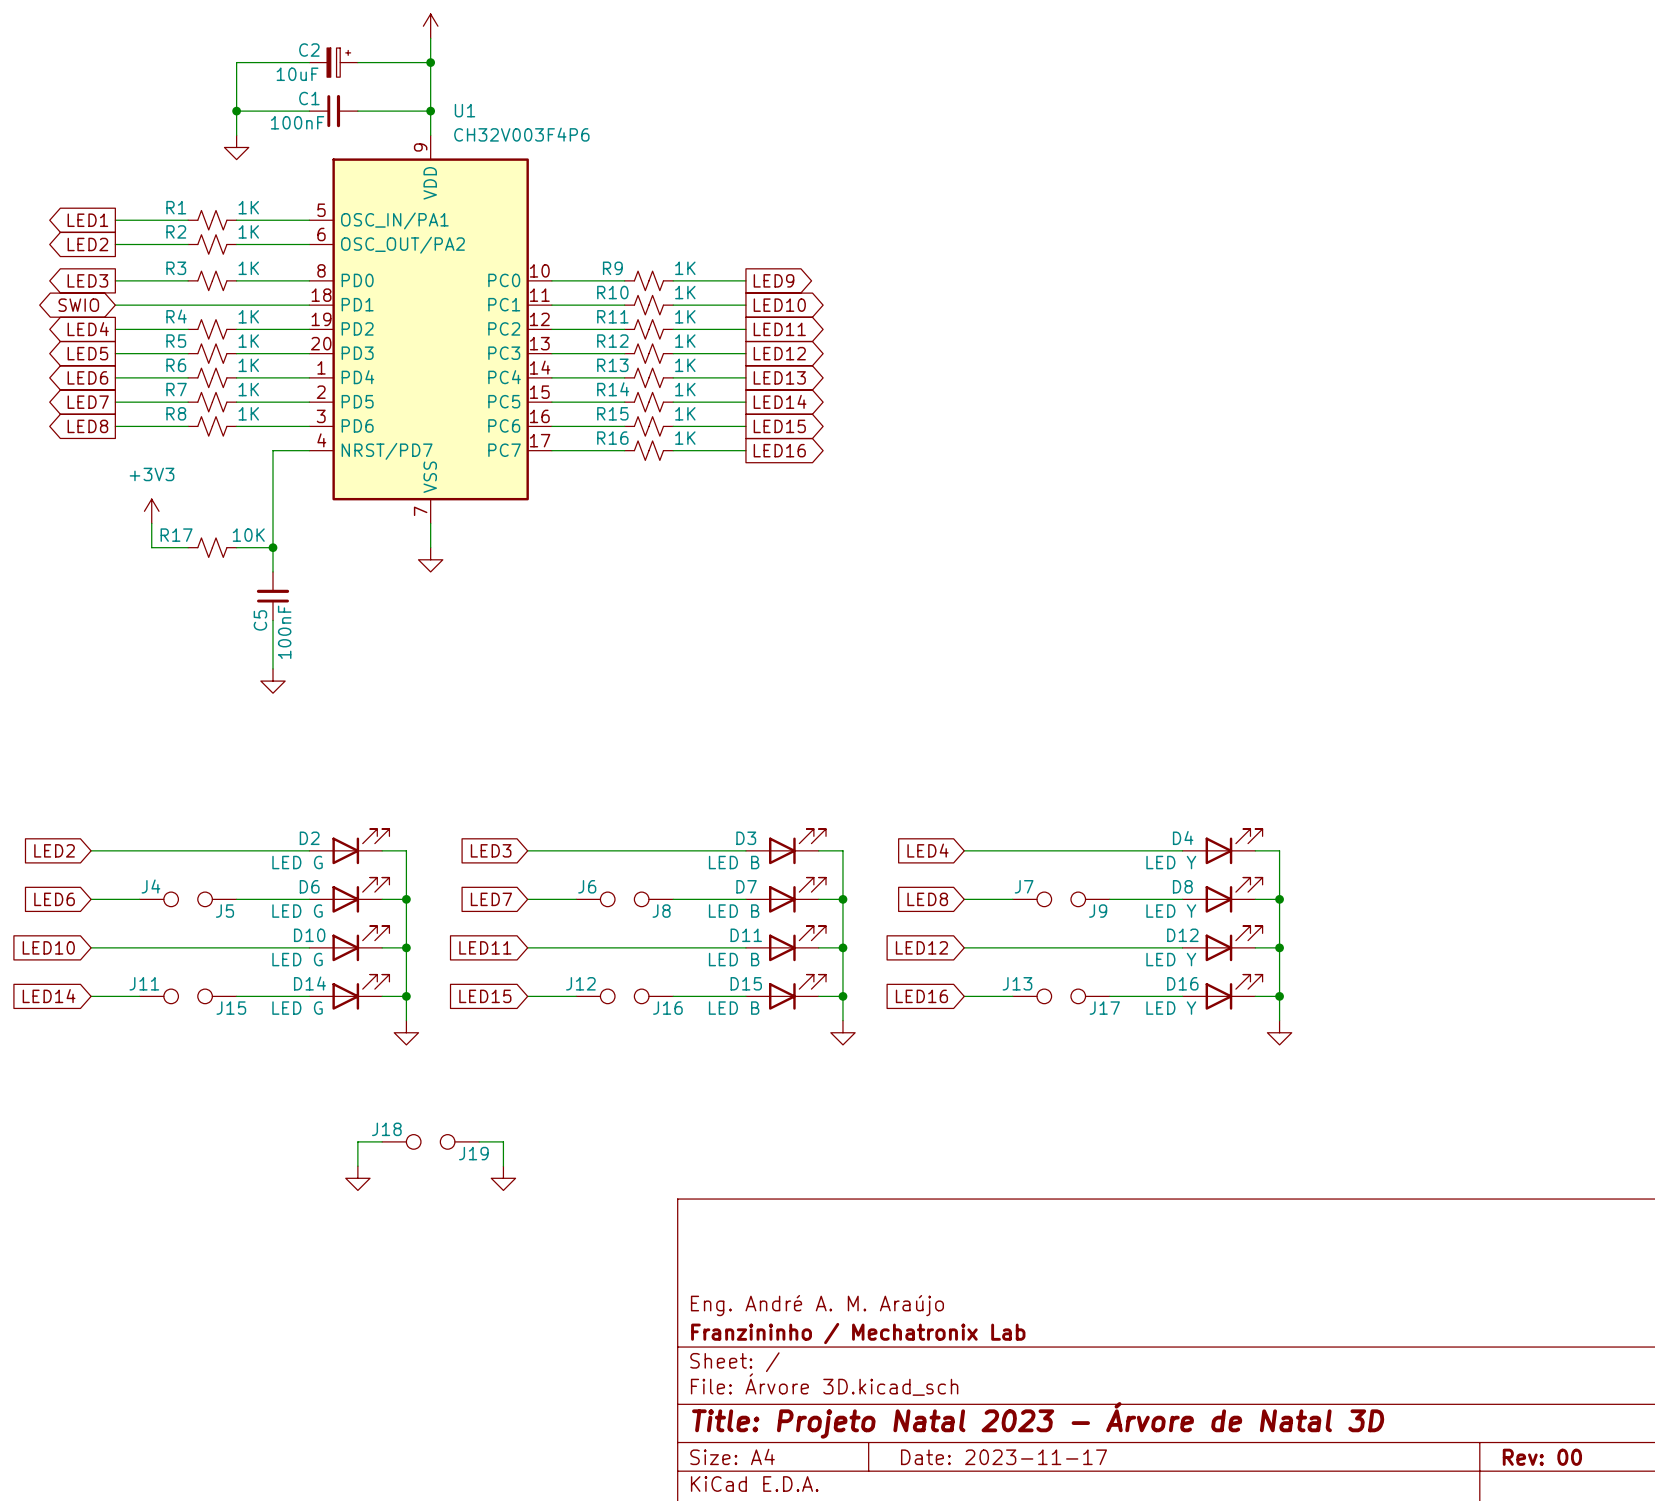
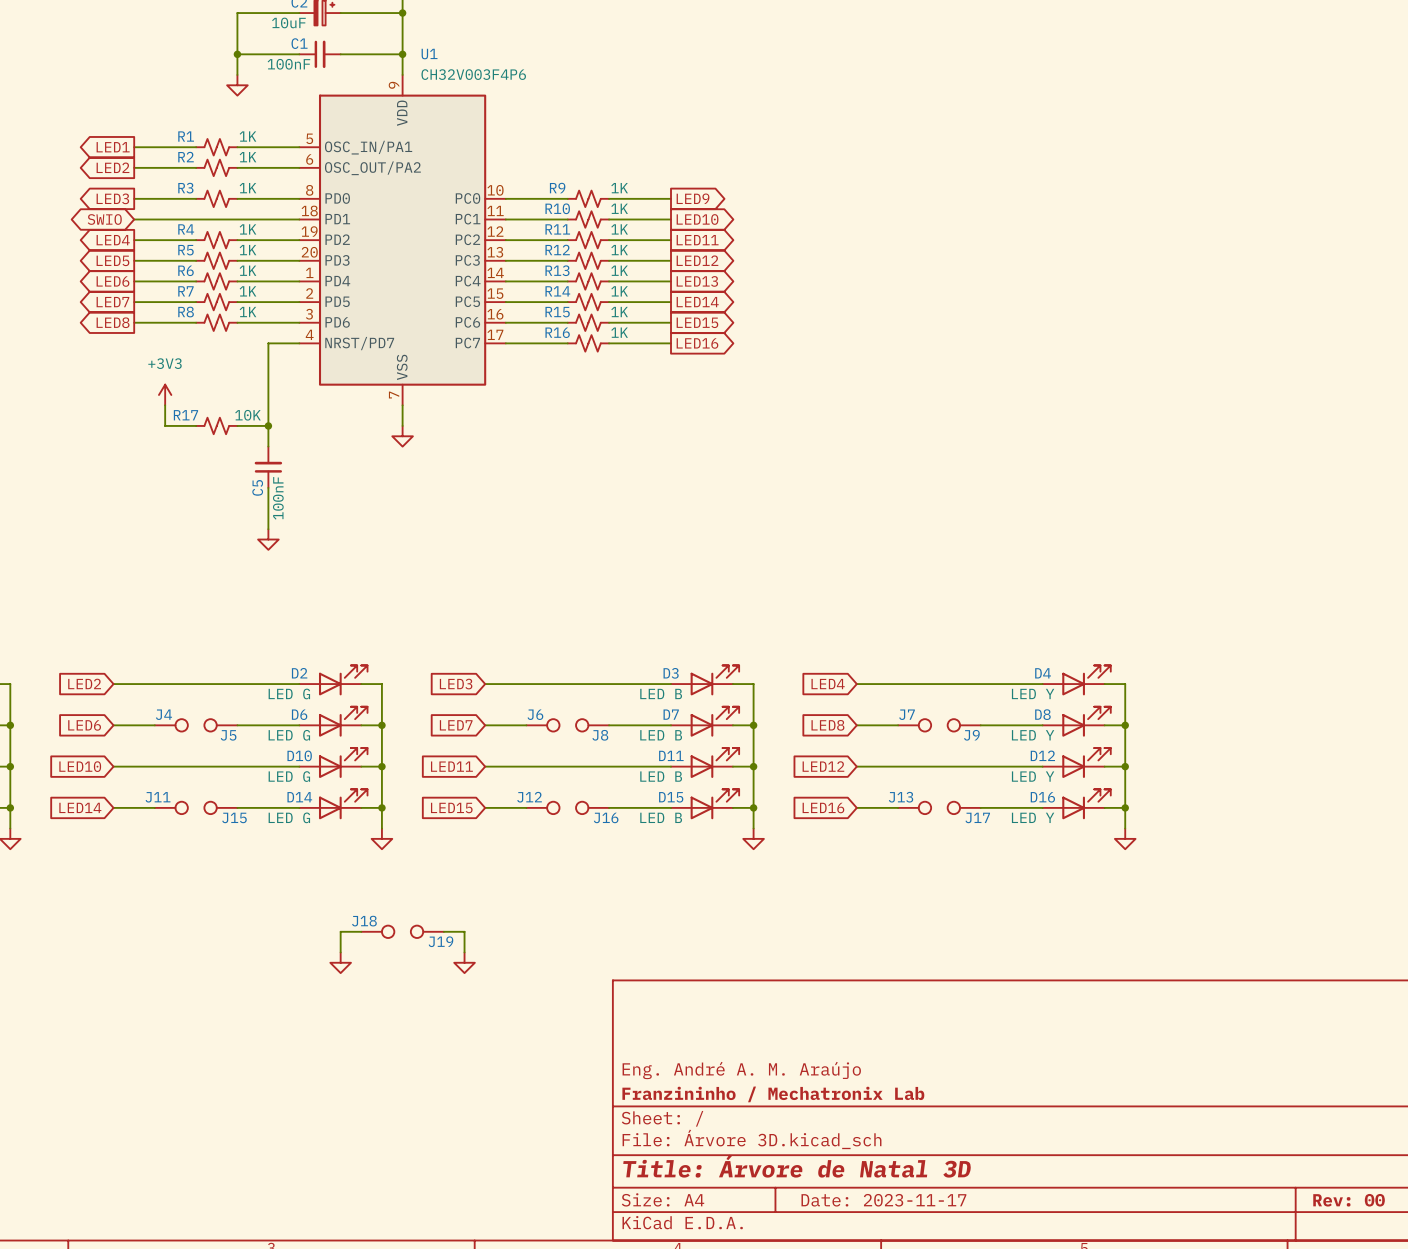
title block: Title: Projeto Natal 2023 - Árvore de Natal 3D (1038, 1420) -> Title: Árvore de Natal 3D (797, 1166)

